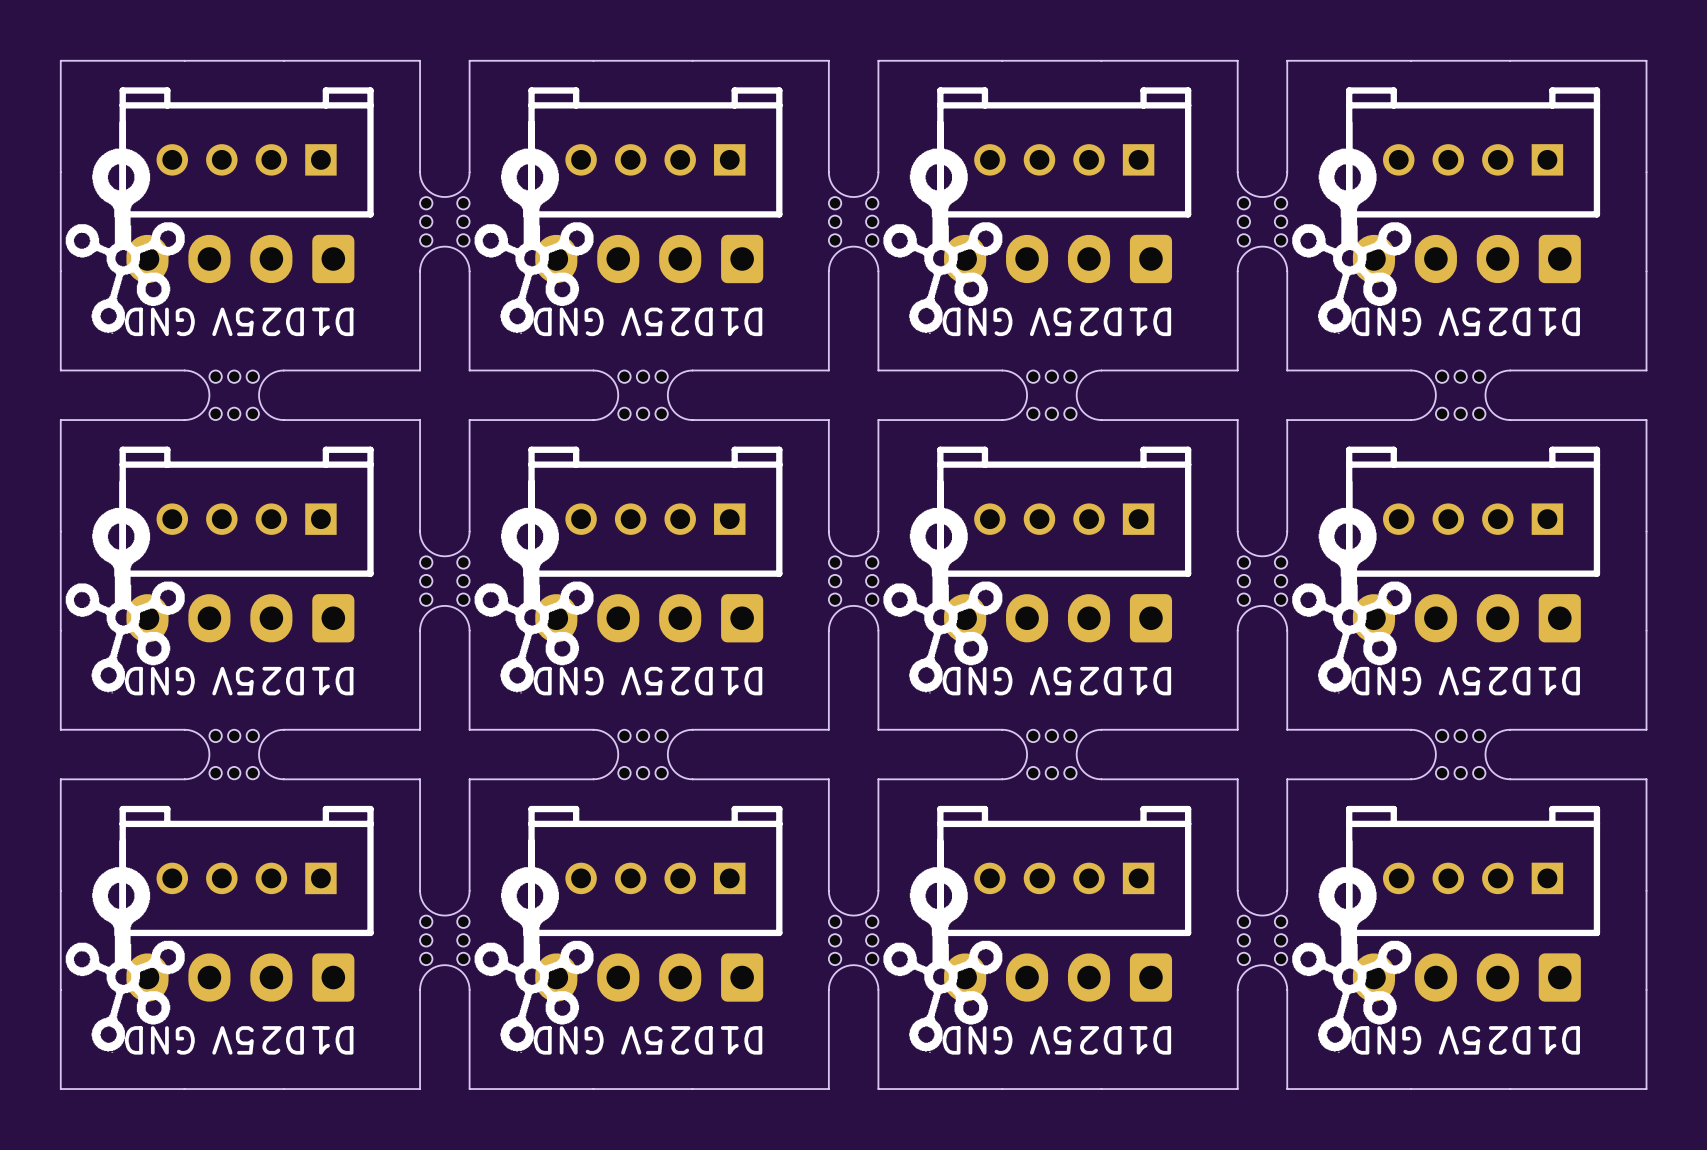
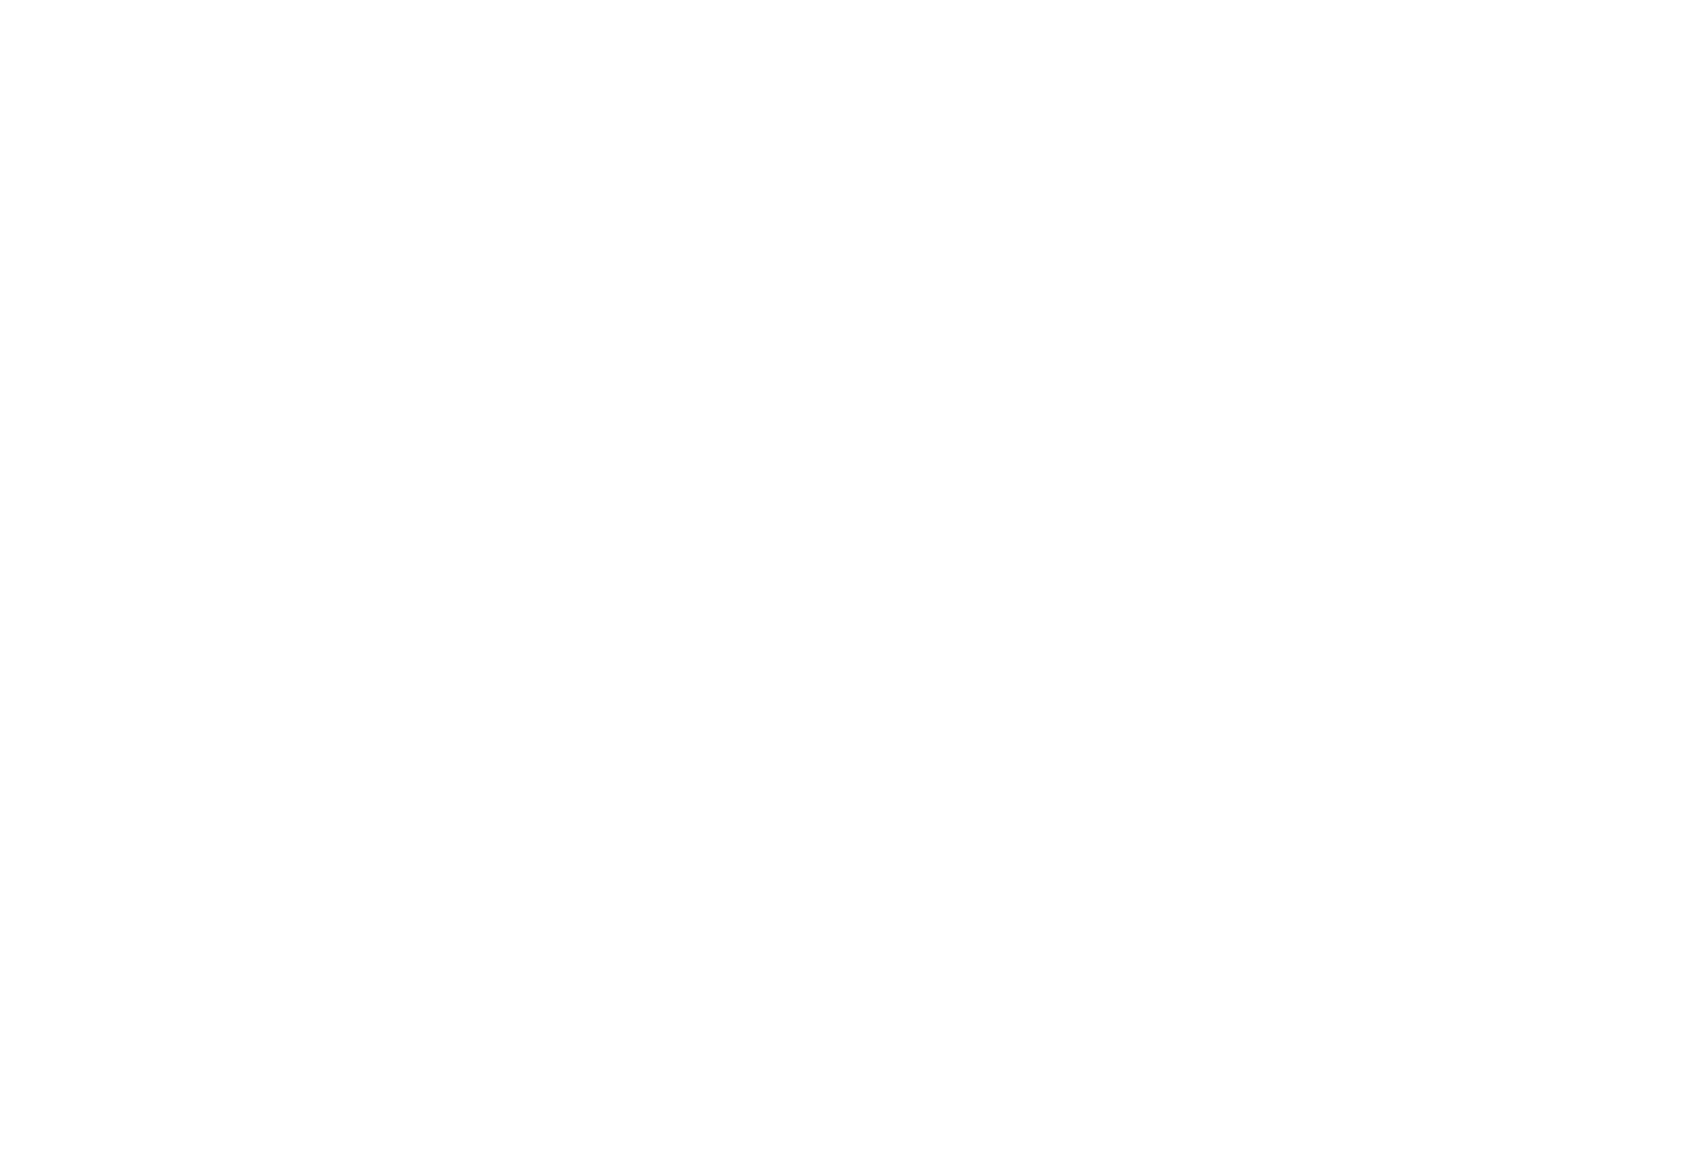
board edge: (1646, 60) (1646, 370) (1507, 370) (1497, 373) (1490, 380) (1485, 395) (1490, 410) (1497, 416) (1507, 419) (1646, 420) (1646, 729) (1507, 729) (1497, 733) (1490, 739) (1485, 754) (1490, 769) (1497, 775) (1507, 779) (1646, 779) (1646, 1089) (1287, 1089) (1286, 983) (1277, 970) (1262, 965) (1247, 970) (1238, 983) (1237, 1089) (878, 1089) (877, 983) (868, 970) (853, 965) (838, 970) (829, 983) (828, 1089) (469, 1089) (468, 983) (459, 970) (444, 965) (429, 970) (420, 983) (420, 1089) (60, 1089) (60, 779) (187, 779) (197, 775) (204, 769) (209, 754) (204, 739) (197, 733) (187, 729) (60, 729) (60, 420) (187, 419) (197, 416) (204, 410) (209, 395) (204, 380) (197, 373) (187, 370) (60, 370) (60, 60) (420, 60) (420, 175) (427, 189) (435, 195) (444, 197) (454, 195) (462, 189) (469, 175) (469, 60) (828, 60) (829, 175) (836, 189) (844, 195) (853, 197) (863, 195) (871, 189) (878, 175) (878, 60) (1237, 60) (1237, 175) (1244, 189) (1252, 195) (1262, 197) (1271, 195) (1279, 189) (1287, 175) (1287, 60) (1646, 60) -> none
drawing: [65, 148, 185, 335] -> none
drawing: [474, 148, 594, 335] -> none
drawing: [883, 148, 1003, 335] -> none
drawing: [1292, 148, 1412, 335] -> none
part: (246, 152) -> none
part: (655, 152) -> none
part: (1064, 152) -> none
part: (1473, 152) -> none
part: (444, 221) -> none
part: (853, 221) -> none
part: (1262, 221) -> none
part: (240, 258) -> none
part: (649, 258) -> none
part: (1058, 258) -> none
part: (1466, 258) -> none
board edge: (469, 271) (469, 370) (596, 370) (605, 373) (613, 380) (617, 388) (618, 398) (611, 412) (596, 419) (469, 420) (468, 537) (459, 551) (451, 555) (441, 556) (427, 549) (420, 534) (420, 420) (280, 419) (271, 416) (264, 410) (259, 401) (259, 392) (266, 377) (280, 370) (420, 370) (420, 271) (423, 258) (435, 248) (451, 247) (464, 256) (469, 271) -> none
board edge: (878, 271) (878, 370) (1005, 370) (1014, 373) (1021, 380) (1026, 388) (1026, 398) (1019, 412) (1005, 419) (878, 420) (877, 537) (868, 551) (860, 555) (850, 556) (836, 549) (829, 534) (828, 420) (689, 419) (680, 416) (672, 410) (668, 401) (668, 392) (675, 377) (689, 370) (828, 370) (828, 271) (832, 258) (844, 248) (860, 247) (873, 256) (878, 271) -> none
board edge: (1287, 271) (1287, 370) (1414, 370) (1423, 373) (1430, 380) (1435, 388) (1435, 398) (1428, 412) (1414, 419) (1287, 420) (1286, 537) (1277, 551) (1268, 555) (1259, 556) (1244, 549) (1237, 534) (1237, 420) (1098, 419) (1089, 416) (1081, 410) (1077, 401) (1076, 392) (1083, 377) (1098, 370) (1237, 370) (1237, 271) (1241, 258) (1252, 248) (1268, 247) (1282, 256) (1287, 271) -> none
text: GND (159, 321) -> none
text: 5V (233, 321) -> none
text: D2 (283, 321) -> none
text: D1 (332, 321) -> none
text: GND (568, 321) -> none
text: 5V (641, 321) -> none
text: D2 (692, 321) -> none
text: D1 (741, 321) -> none
text: GND (977, 321) -> none
text: 5V (1050, 321) -> none
text: D2 (1100, 321) -> none
text: D1 (1150, 321) -> none
text: GND (1386, 321) -> none
text: 5V (1459, 321) -> none
text: D2 (1509, 321) -> none
text: D1 (1559, 321) -> none
part: (234, 395) -> none
part: (643, 395) -> none
part: (1051, 395) -> none
part: (1460, 395) -> none
drawing: [65, 507, 185, 694] -> none
drawing: [474, 507, 594, 694] -> none
drawing: [883, 507, 1003, 694] -> none
drawing: [1292, 507, 1412, 694] -> none
part: (246, 511) -> none
part: (655, 511) -> none
part: (1064, 511) -> none
part: (1473, 511) -> none
part: (444, 581) -> none
part: (853, 581) -> none
part: (1262, 581) -> none
part: (240, 618) -> none
part: (649, 618) -> none
part: (1058, 618) -> none
part: (1466, 618) -> none
board edge: (469, 630) (469, 729) (596, 729) (605, 733) (613, 739) (617, 748) (618, 757) (611, 772) (596, 779) (469, 779) (468, 897) (459, 910) (451, 914) (441, 915) (427, 908) (420, 894) (420, 779) (280, 779) (271, 775) (264, 769) (259, 760) (259, 751) (266, 737) (280, 729) (420, 729) (420, 630) (423, 618) (435, 607) (451, 606) (464, 615) (469, 630) -> none
board edge: (878, 630) (878, 729) (1005, 729) (1014, 733) (1021, 739) (1026, 748) (1026, 757) (1019, 772) (1005, 779) (878, 779) (877, 897) (868, 910) (860, 914) (850, 915) (836, 908) (829, 894) (828, 779) (689, 779) (680, 775) (672, 769) (668, 760) (668, 751) (675, 737) (689, 729) (828, 729) (828, 630) (832, 618) (844, 607) (860, 606) (873, 615) (878, 630) -> none
board edge: (1287, 630) (1287, 729) (1414, 729) (1423, 733) (1430, 739) (1435, 748) (1435, 757) (1428, 772) (1414, 779) (1287, 779) (1286, 897) (1277, 910) (1268, 914) (1259, 915) (1244, 908) (1237, 894) (1237, 779) (1098, 779) (1089, 775) (1081, 769) (1077, 760) (1076, 751) (1083, 737) (1098, 729) (1237, 729) (1237, 630) (1241, 618) (1252, 607) (1268, 606) (1282, 615) (1287, 630) -> none
text: GND (159, 681) -> none
text: 5V (233, 681) -> none
text: D2 (283, 681) -> none
text: D1 (332, 681) -> none
text: GND (568, 681) -> none
text: 5V (641, 681) -> none
text: D2 (692, 681) -> none
text: D1 (741, 681) -> none
text: GND (977, 681) -> none
text: 5V (1050, 681) -> none
text: D2 (1100, 681) -> none
text: D1 (1150, 681) -> none
text: GND (1386, 681) -> none
text: 5V (1459, 681) -> none
text: D2 (1509, 681) -> none
text: D1 (1559, 681) -> none
part: (234, 754) -> none
part: (643, 754) -> none
part: (1051, 754) -> none
part: (1460, 754) -> none
drawing: [65, 866, 185, 1053] -> none
drawing: [474, 866, 594, 1053] -> none
drawing: [883, 866, 1003, 1053] -> none
drawing: [1292, 866, 1412, 1053] -> none
part: (246, 870) -> none
part: (655, 870) -> none
part: (1064, 870) -> none
part: (1473, 870) -> none
part: (444, 940) -> none
part: (853, 940) -> none
part: (1262, 940) -> none
part: (240, 977) -> none
part: (649, 977) -> none
part: (1058, 977) -> none
part: (1466, 977) -> none
text: GND (159, 1040) -> none
text: 5V (233, 1040) -> none
text: D2 (283, 1040) -> none
text: D1 (332, 1040) -> none
text: GND (568, 1040) -> none
text: 5V (641, 1040) -> none
text: D2 (692, 1040) -> none
text: D1 (741, 1040) -> none
text: GND (977, 1040) -> none
text: 5V (1050, 1040) -> none
text: D2 (1100, 1040) -> none
text: D1 (1150, 1040) -> none
text: GND (1386, 1040) -> none
text: 5V (1459, 1040) -> none
text: D2 (1509, 1040) -> none
text: D1 (1559, 1040) -> none

